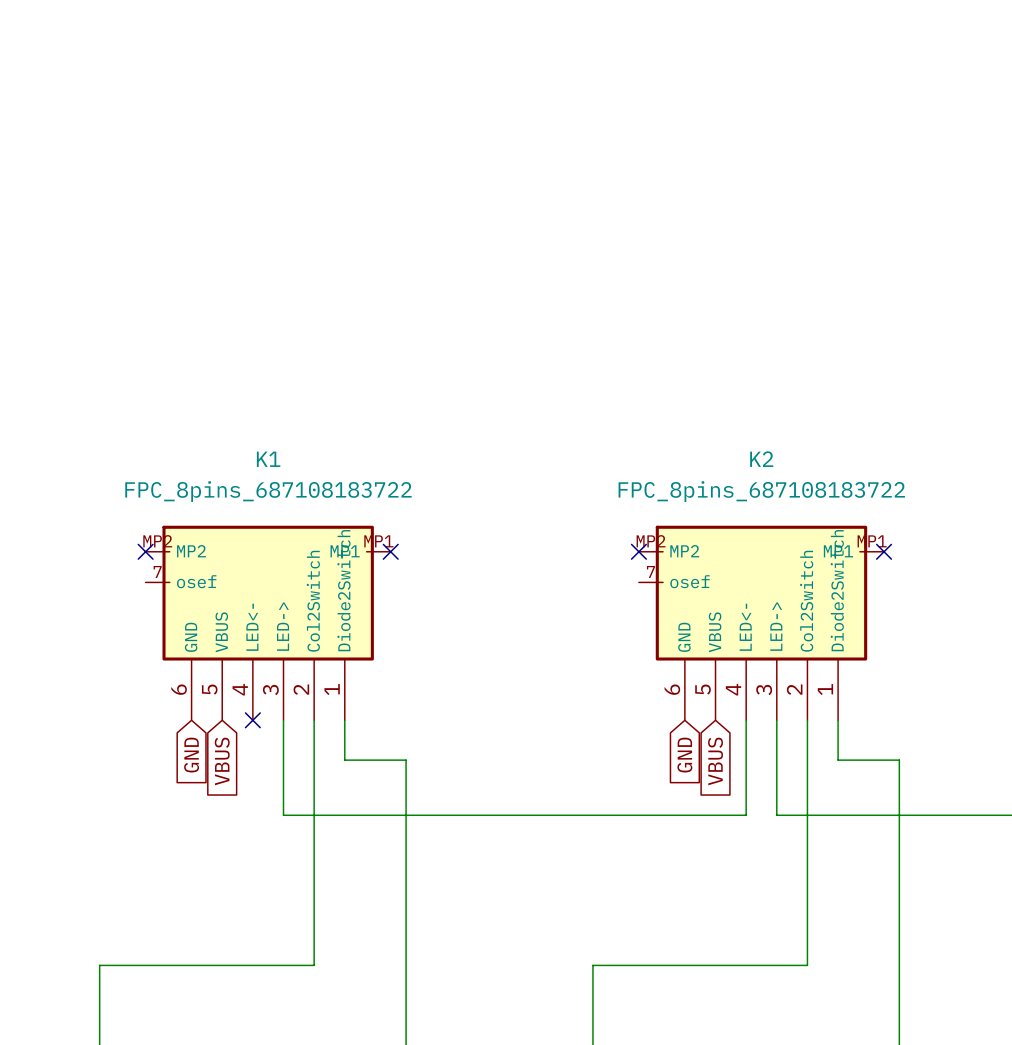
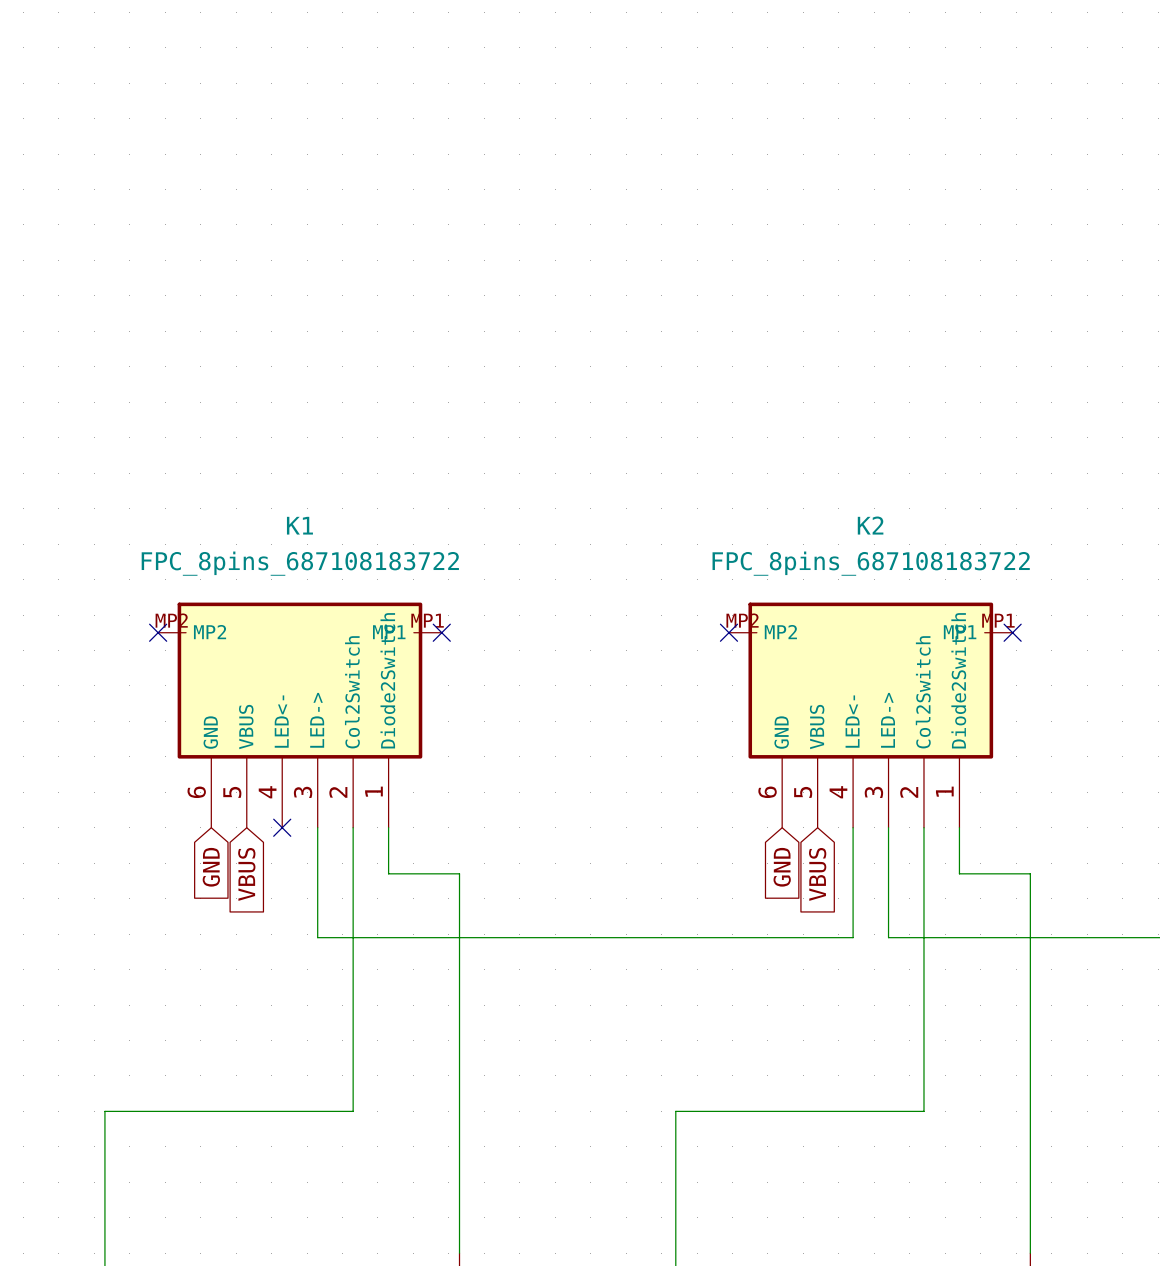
K1 symbol: [145, 525, 391, 721] -> [158, 602, 442, 828]
K2 symbol: [638, 525, 885, 721] -> [728, 602, 1013, 828]

